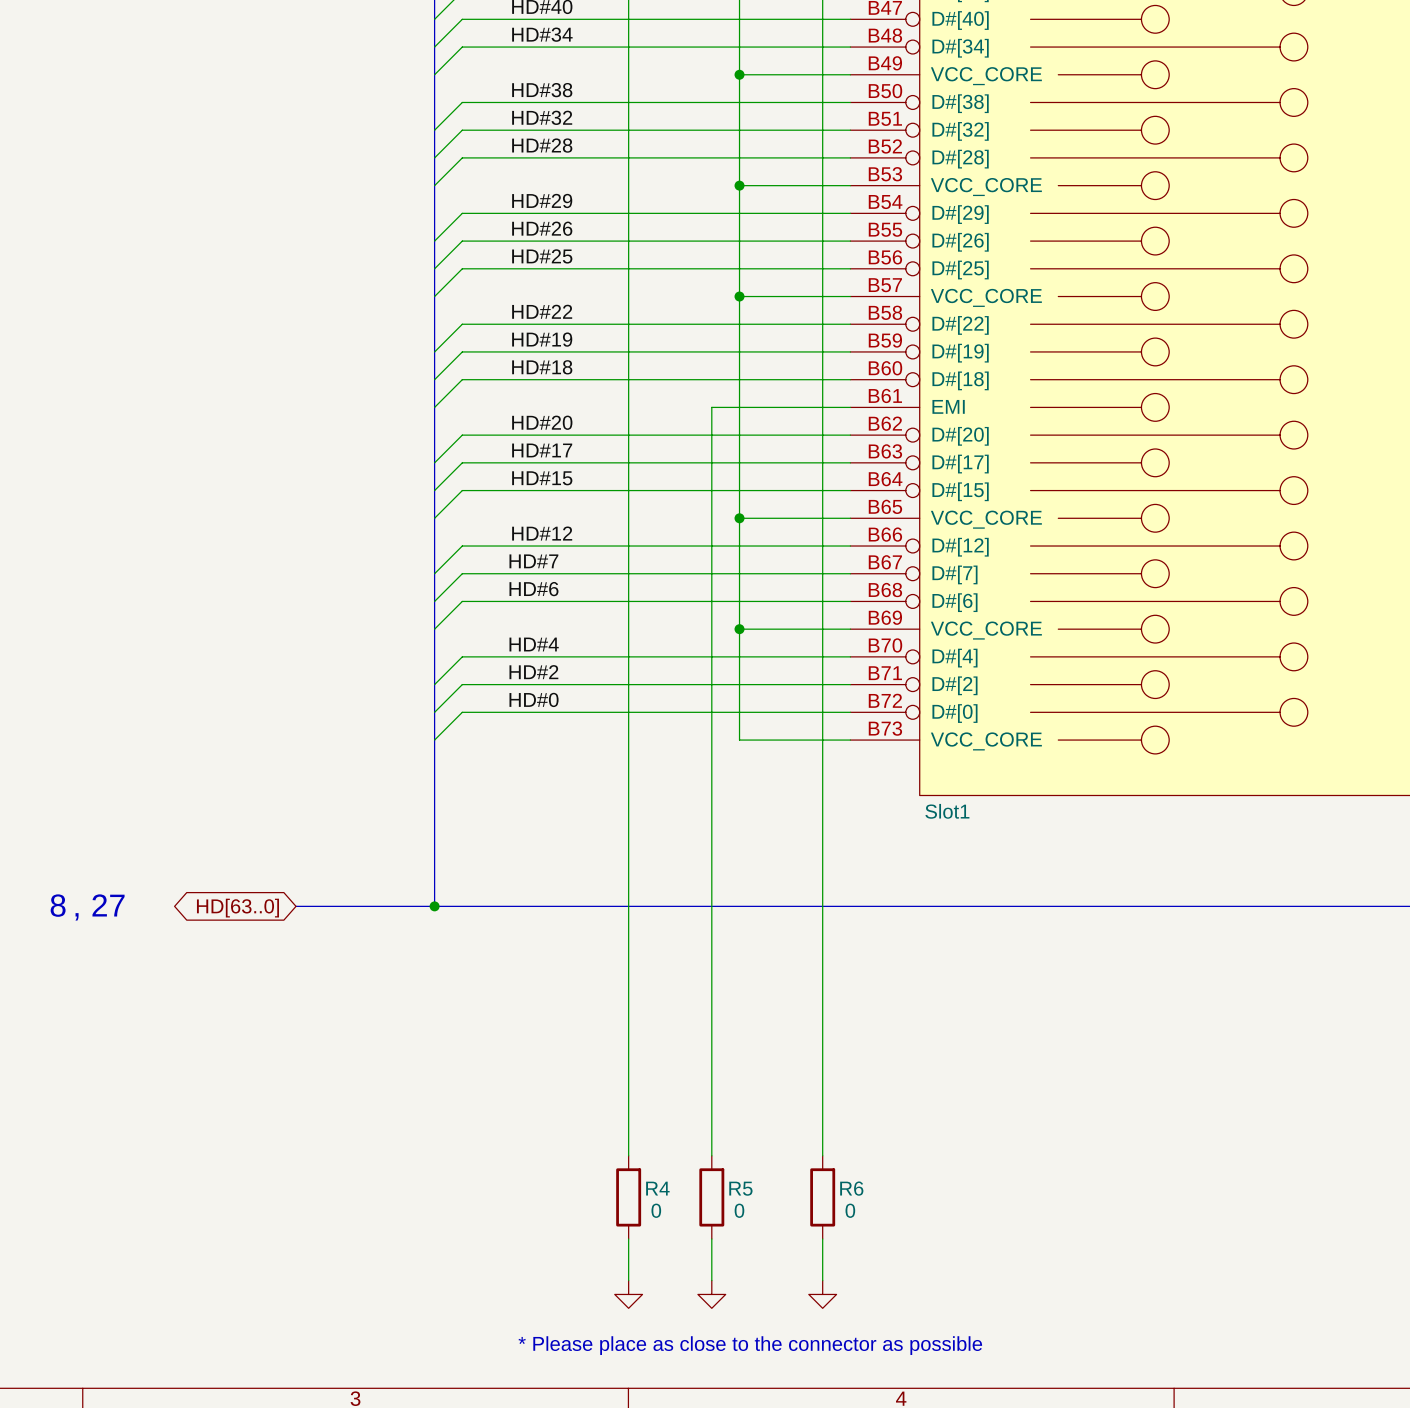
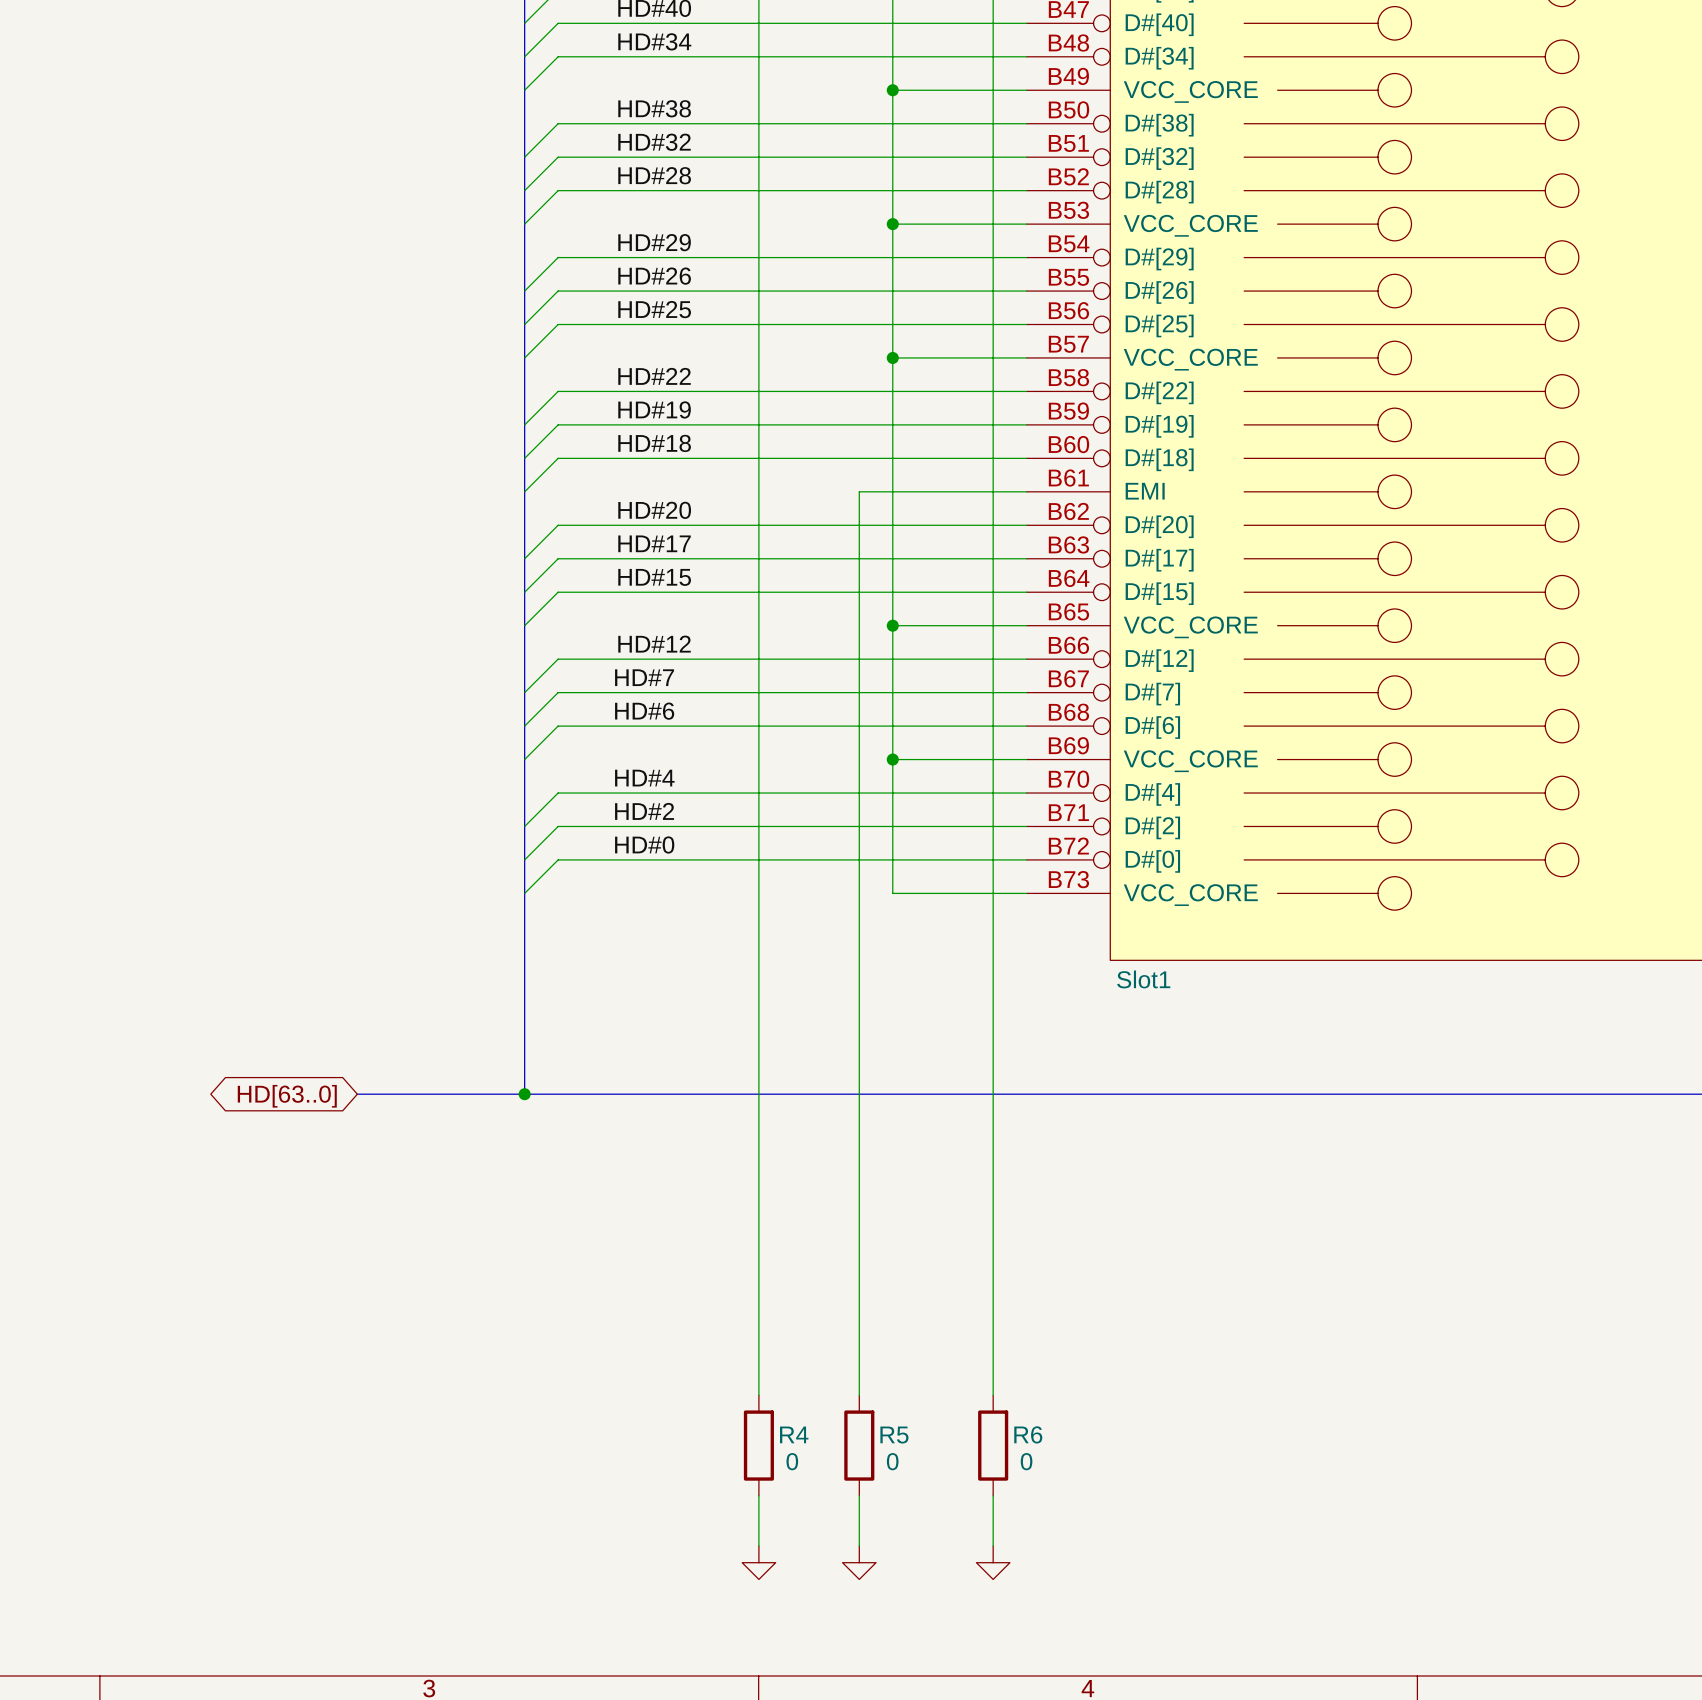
text: 8 (58, 905) -> none
text: 27 (108, 905) -> none
text: , (77, 916) -> none
text: * Please place as close to the connector as possible (750, 1345) -> none

